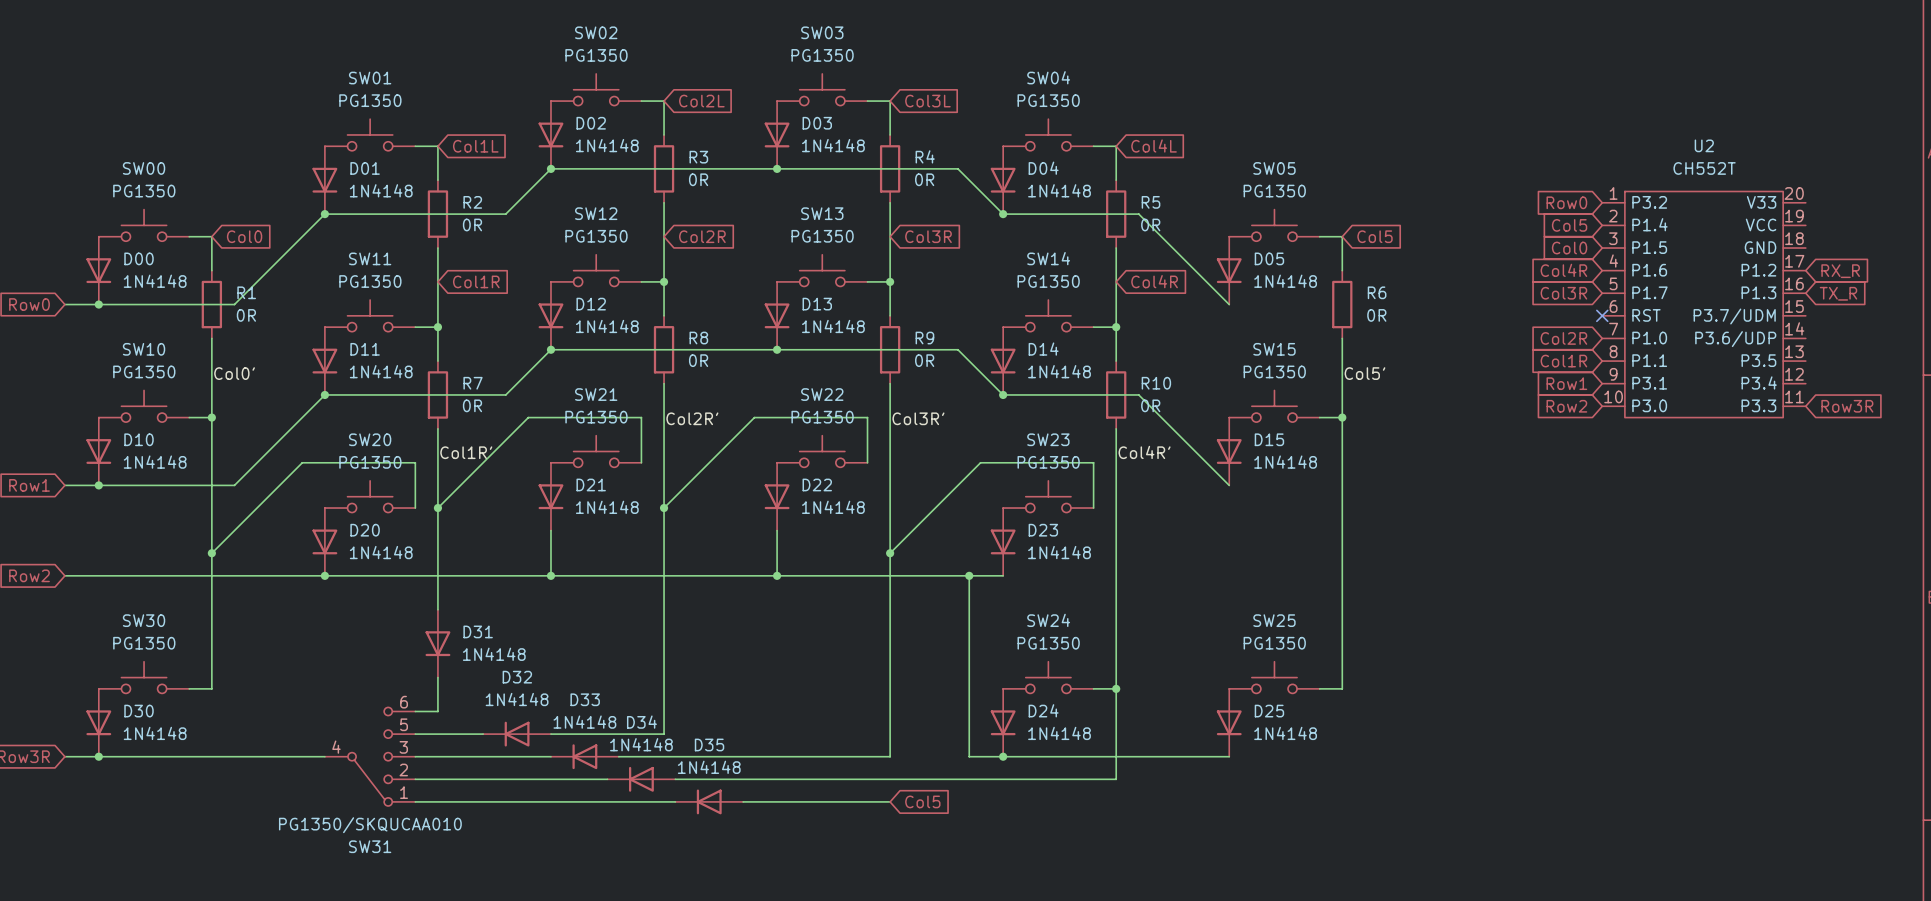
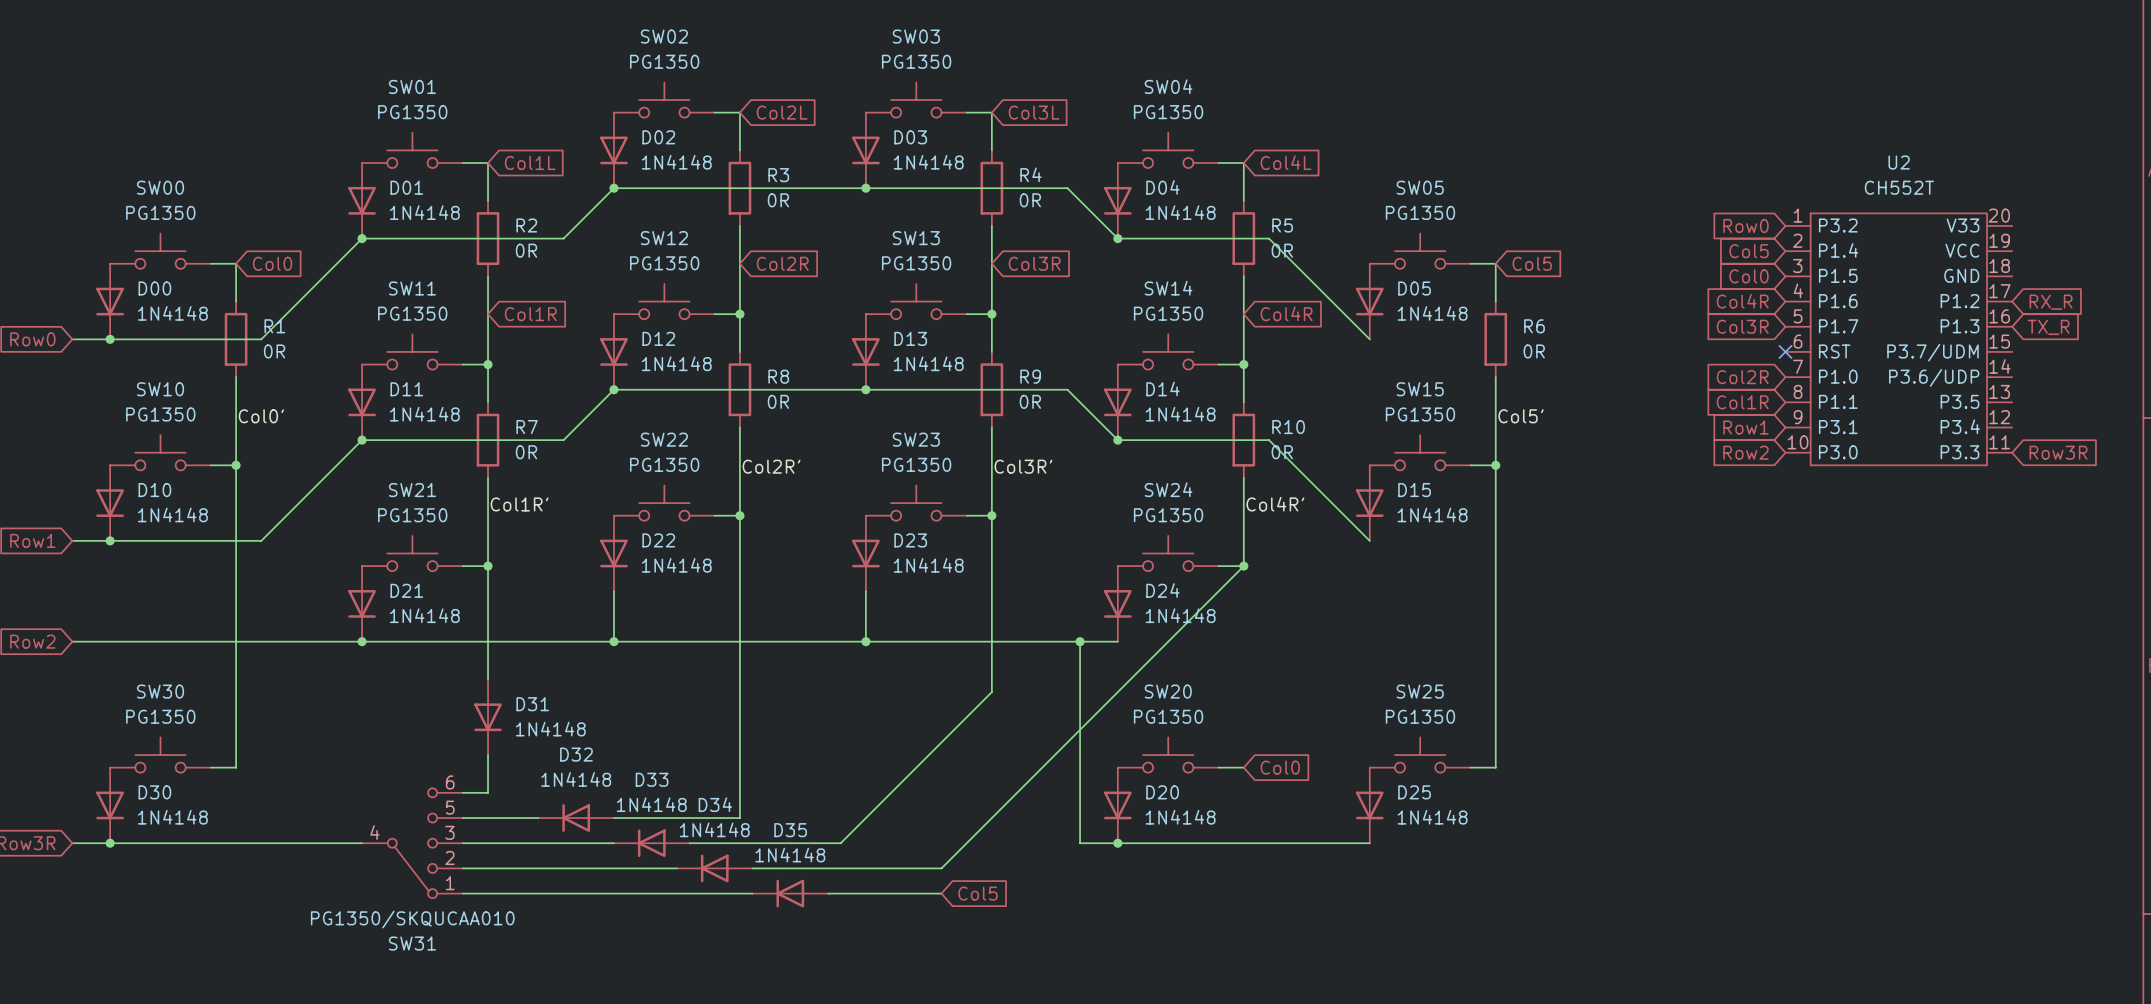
SW21 name: SW21 (596, 394) -> SW22 (664, 439)
SW22 name: SW22 (822, 394) -> SW23 (916, 439)
SW20 name: SW20 (370, 439) -> SW21 (412, 490)
SW23 name: SW23 (1048, 439) -> SW24 (1168, 489)
wire: (641, 462) (641, 417) (528, 417) (437, 508) -> (714, 515) (739, 515)
wire: (867, 462) (867, 417) (754, 417) (664, 508) -> (966, 515) (991, 515)
junction: none -> (991, 515)
D21 name: D21 (591, 484) -> D22 (658, 540)
D22 name: D22 (817, 484) -> D23 (910, 540)
wire: (415, 508) (415, 462) (302, 462) (211, 553) -> (462, 566) (488, 566)
junction position: (664, 508) -> (739, 515)
wire: (1093, 508) (1093, 462) (980, 462) (890, 553) -> none
wire: (1116, 508) (1116, 779) (844, 779) -> (1218, 566) (1243, 566) (941, 868)
junction: none -> (1243, 566)
D20 name: D20 (365, 530) -> D21 (406, 590)
D23 name: D23 (1043, 530) -> D24 (1162, 590)
junction: (211, 553) -> none
junction: (890, 553) -> none
SW24 name: SW24 (1048, 620) -> SW20 (1168, 691)
wire: (890, 621) (890, 756) (754, 756) -> (991, 692) (840, 843)
junction: (1116, 688) -> none
global label: none -> Col0 (1280, 767)
D24 name: D24 (1043, 710) -> D20 (1162, 792)
wire: (844, 801) (890, 801) -> none
global label position: Col5 (922, 801) -> Col5 (977, 893)

